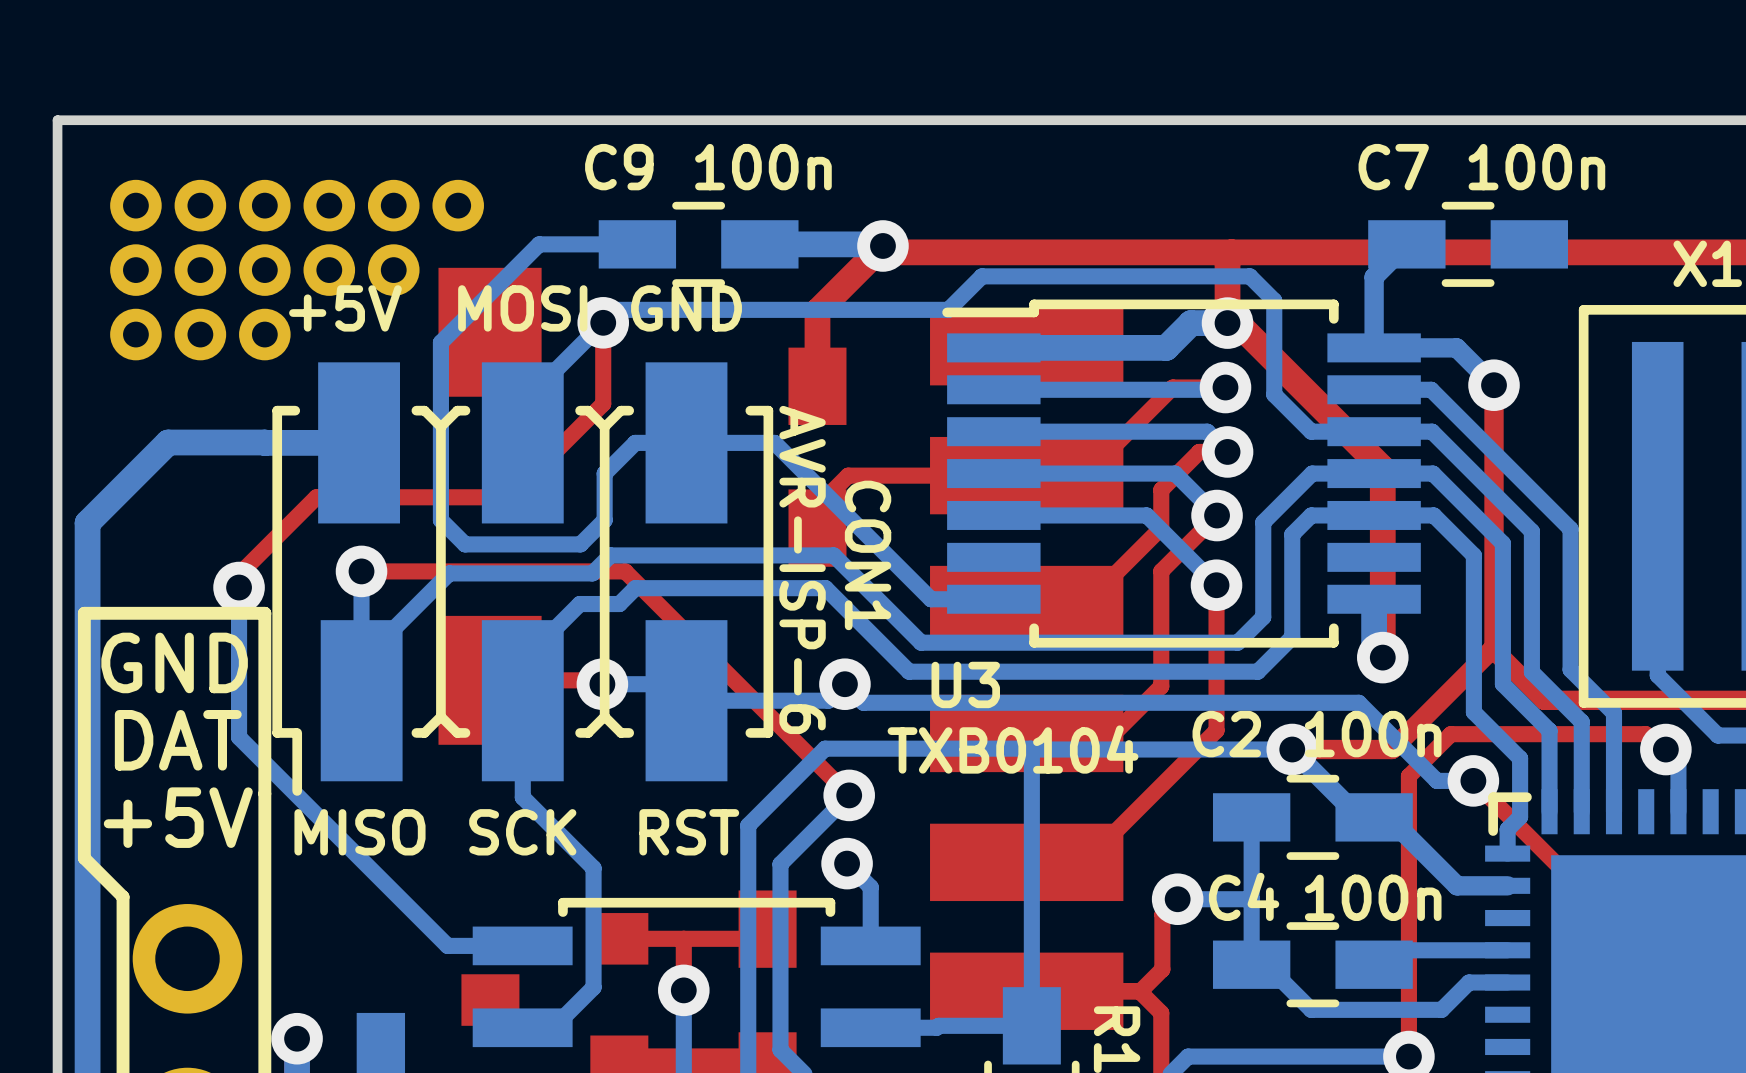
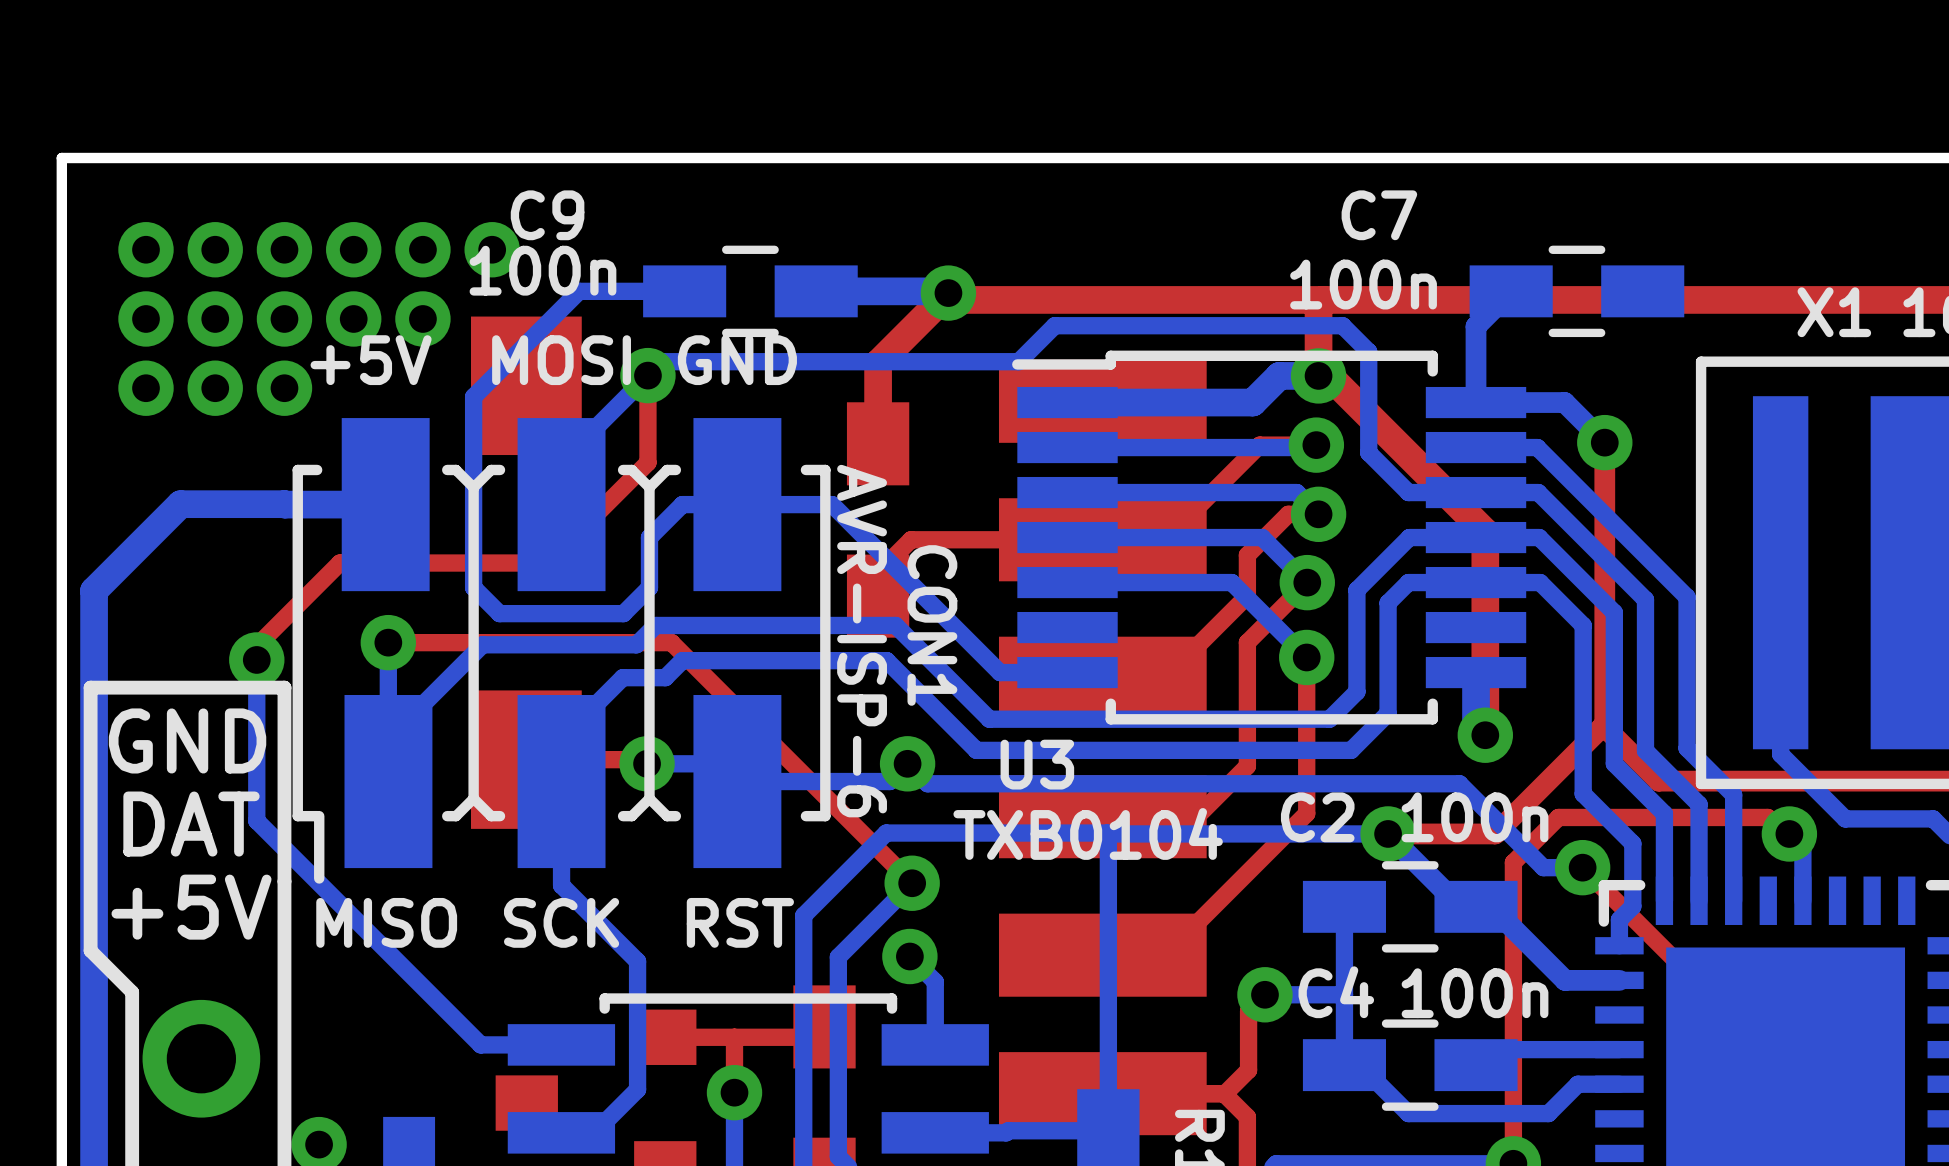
C9 name position: C9 (619, 167) -> C9 (547, 215)
C9 value position: 100n (763, 167) -> 100n (542, 270)
C7 name position: C7 (1393, 167) -> C7 (1379, 215)
C7 value position: 100n (1536, 167) -> 100n (1363, 284)

